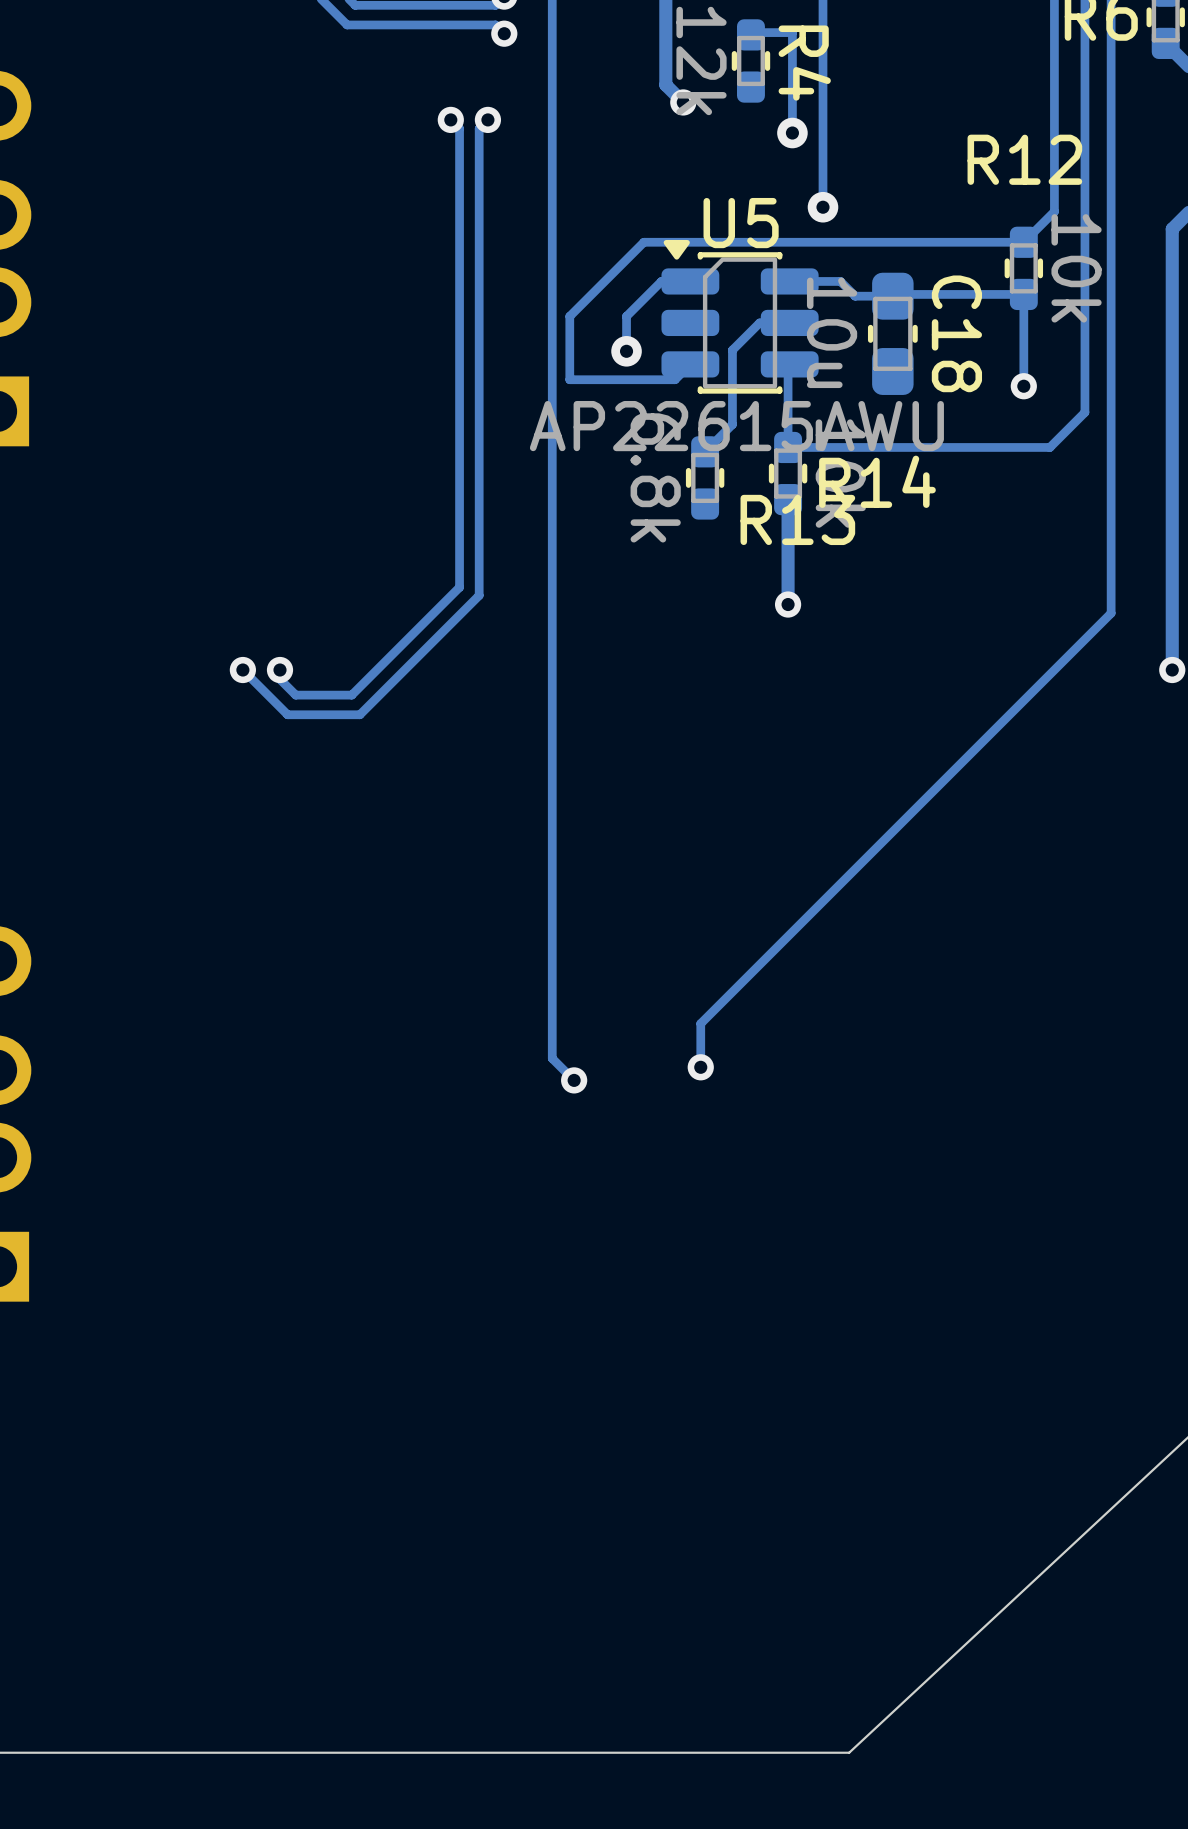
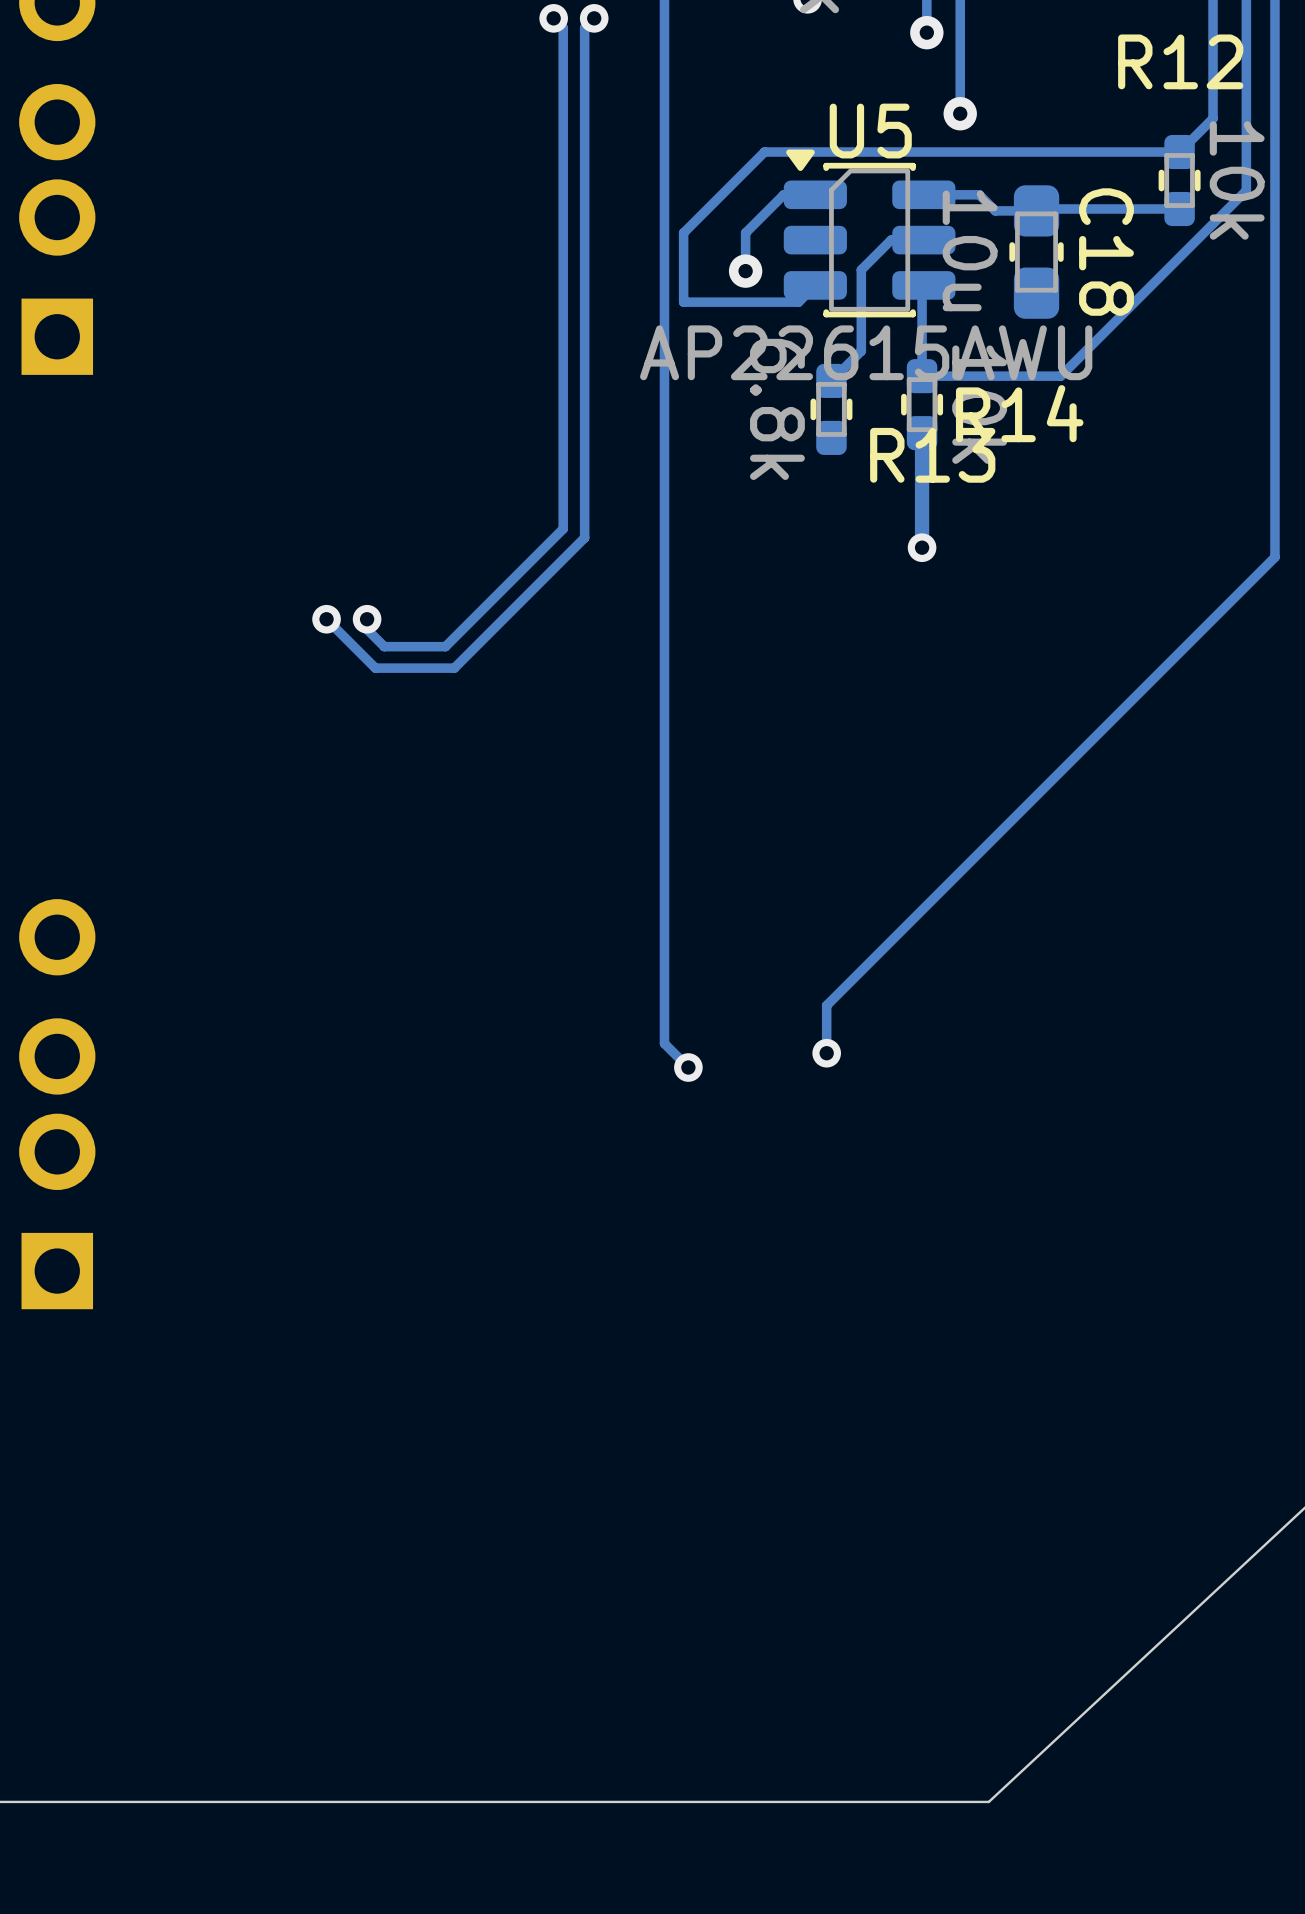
track: (1084, 277) (1084, 412) (1049, 447) (915, 447) -> (1246, 190) (1060, 376)
track: (1023, 294) (1023, 386) -> none
via: (1023, 386) -> none

